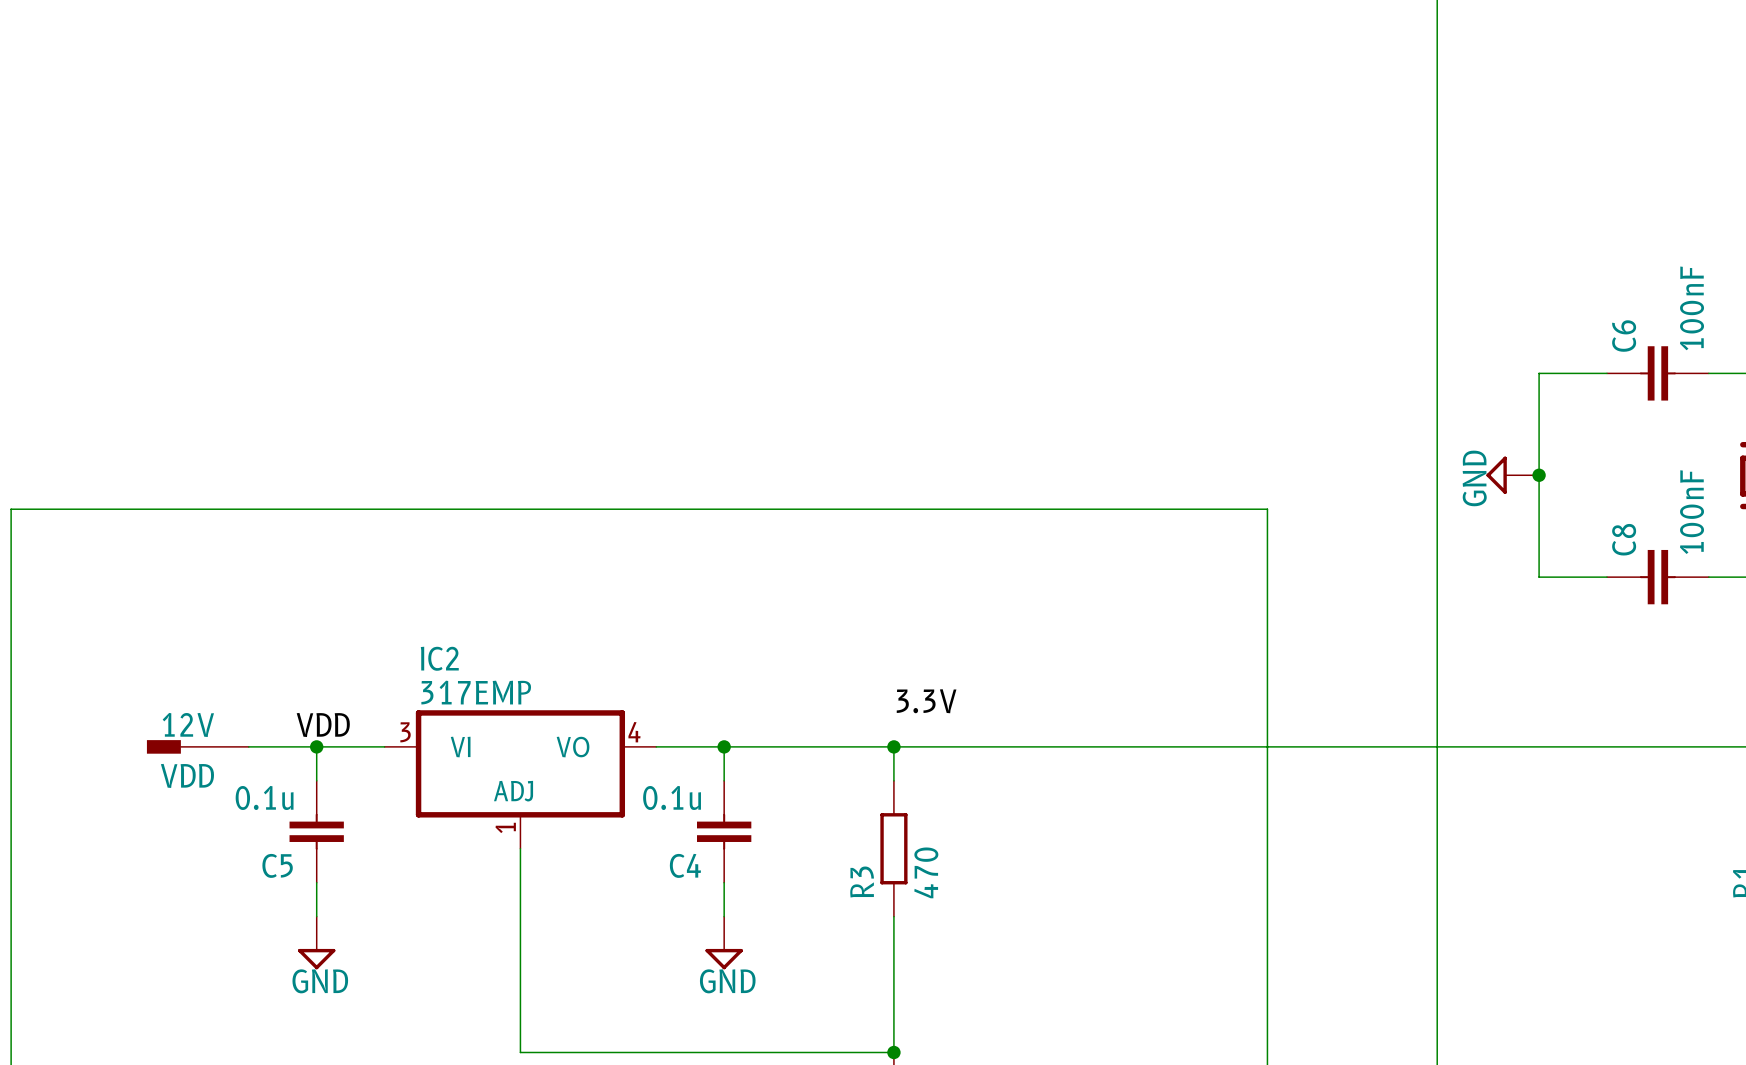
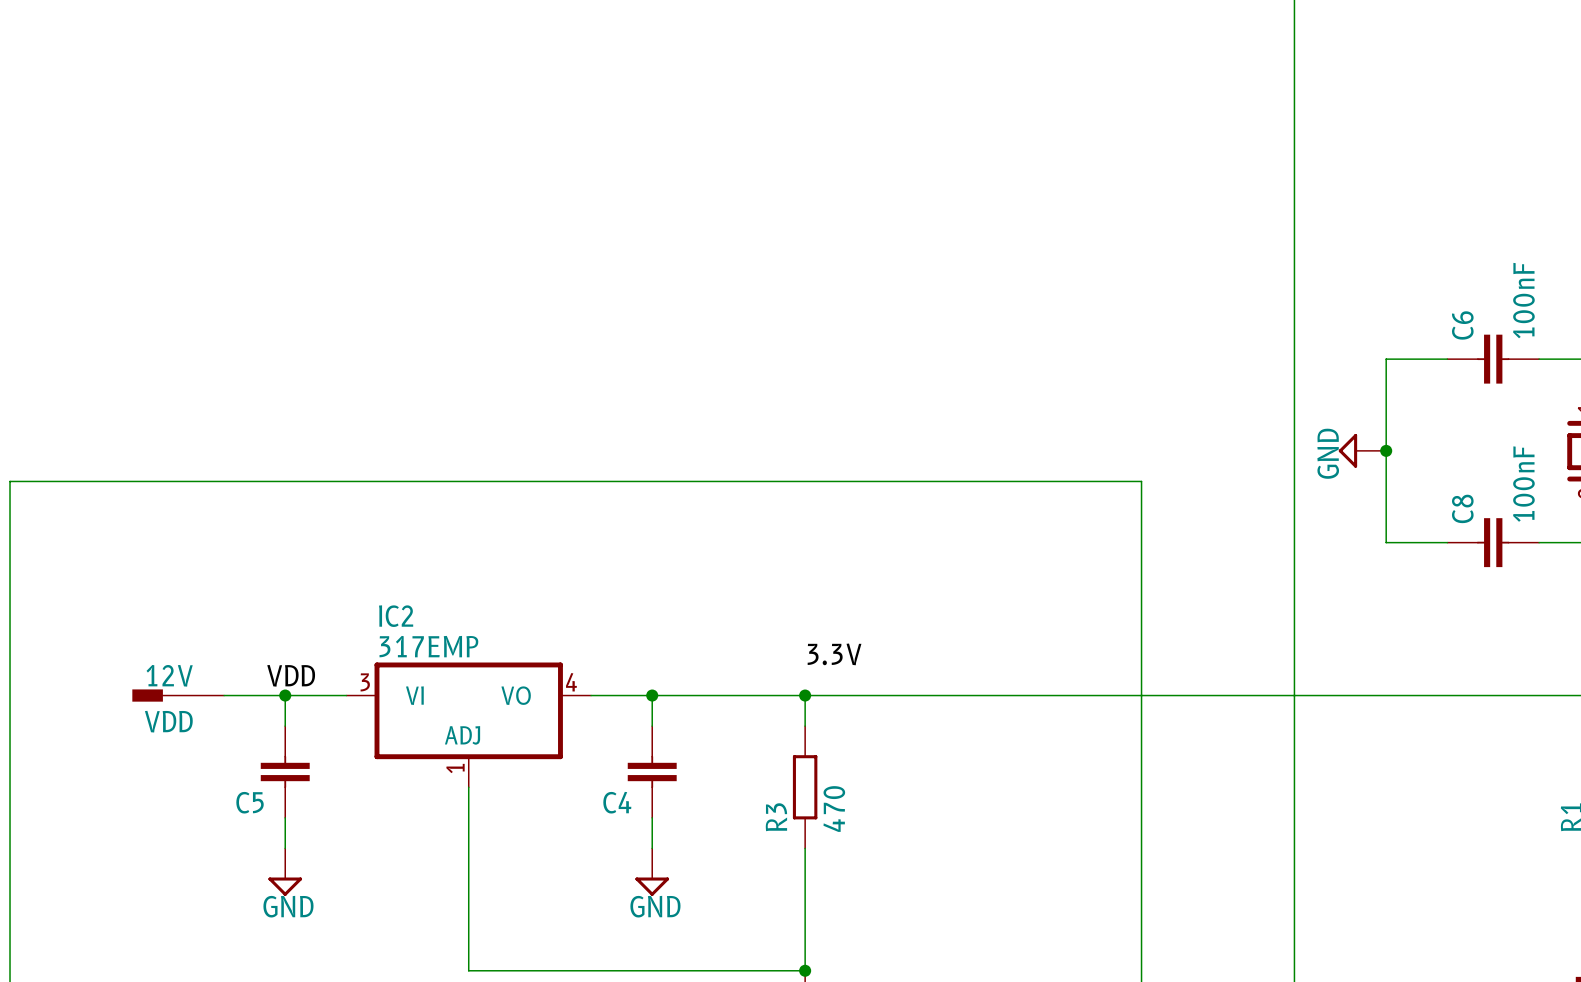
C5 value: 0.1u (264, 797) -> none
C4 value: 0.1u (672, 797) -> none

